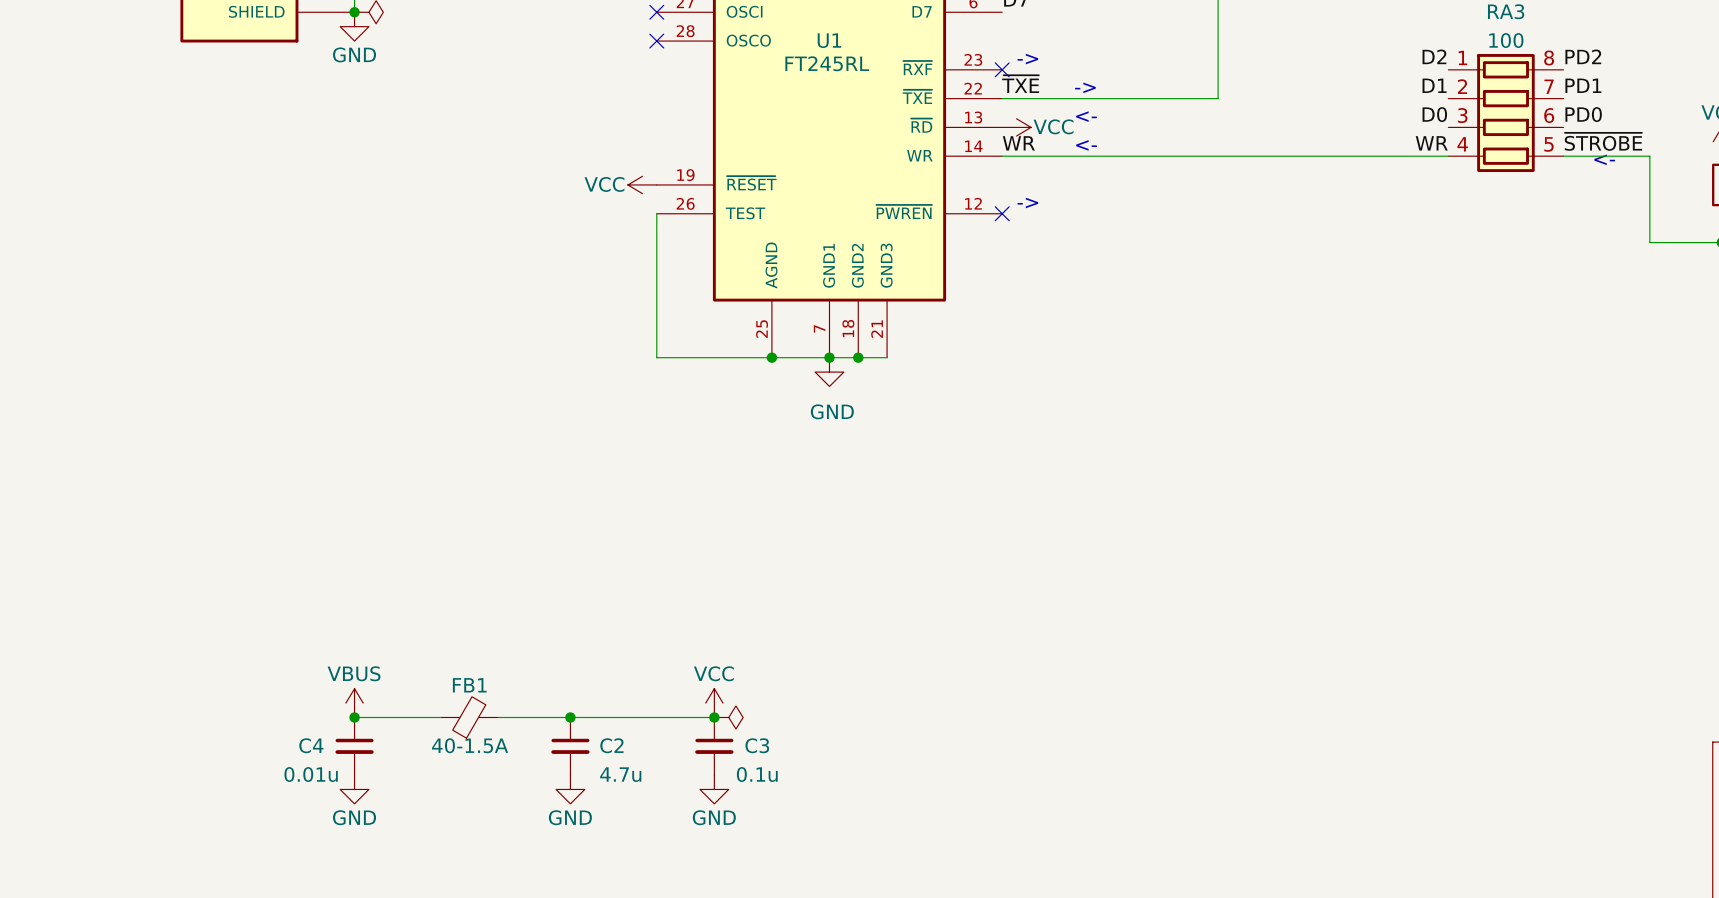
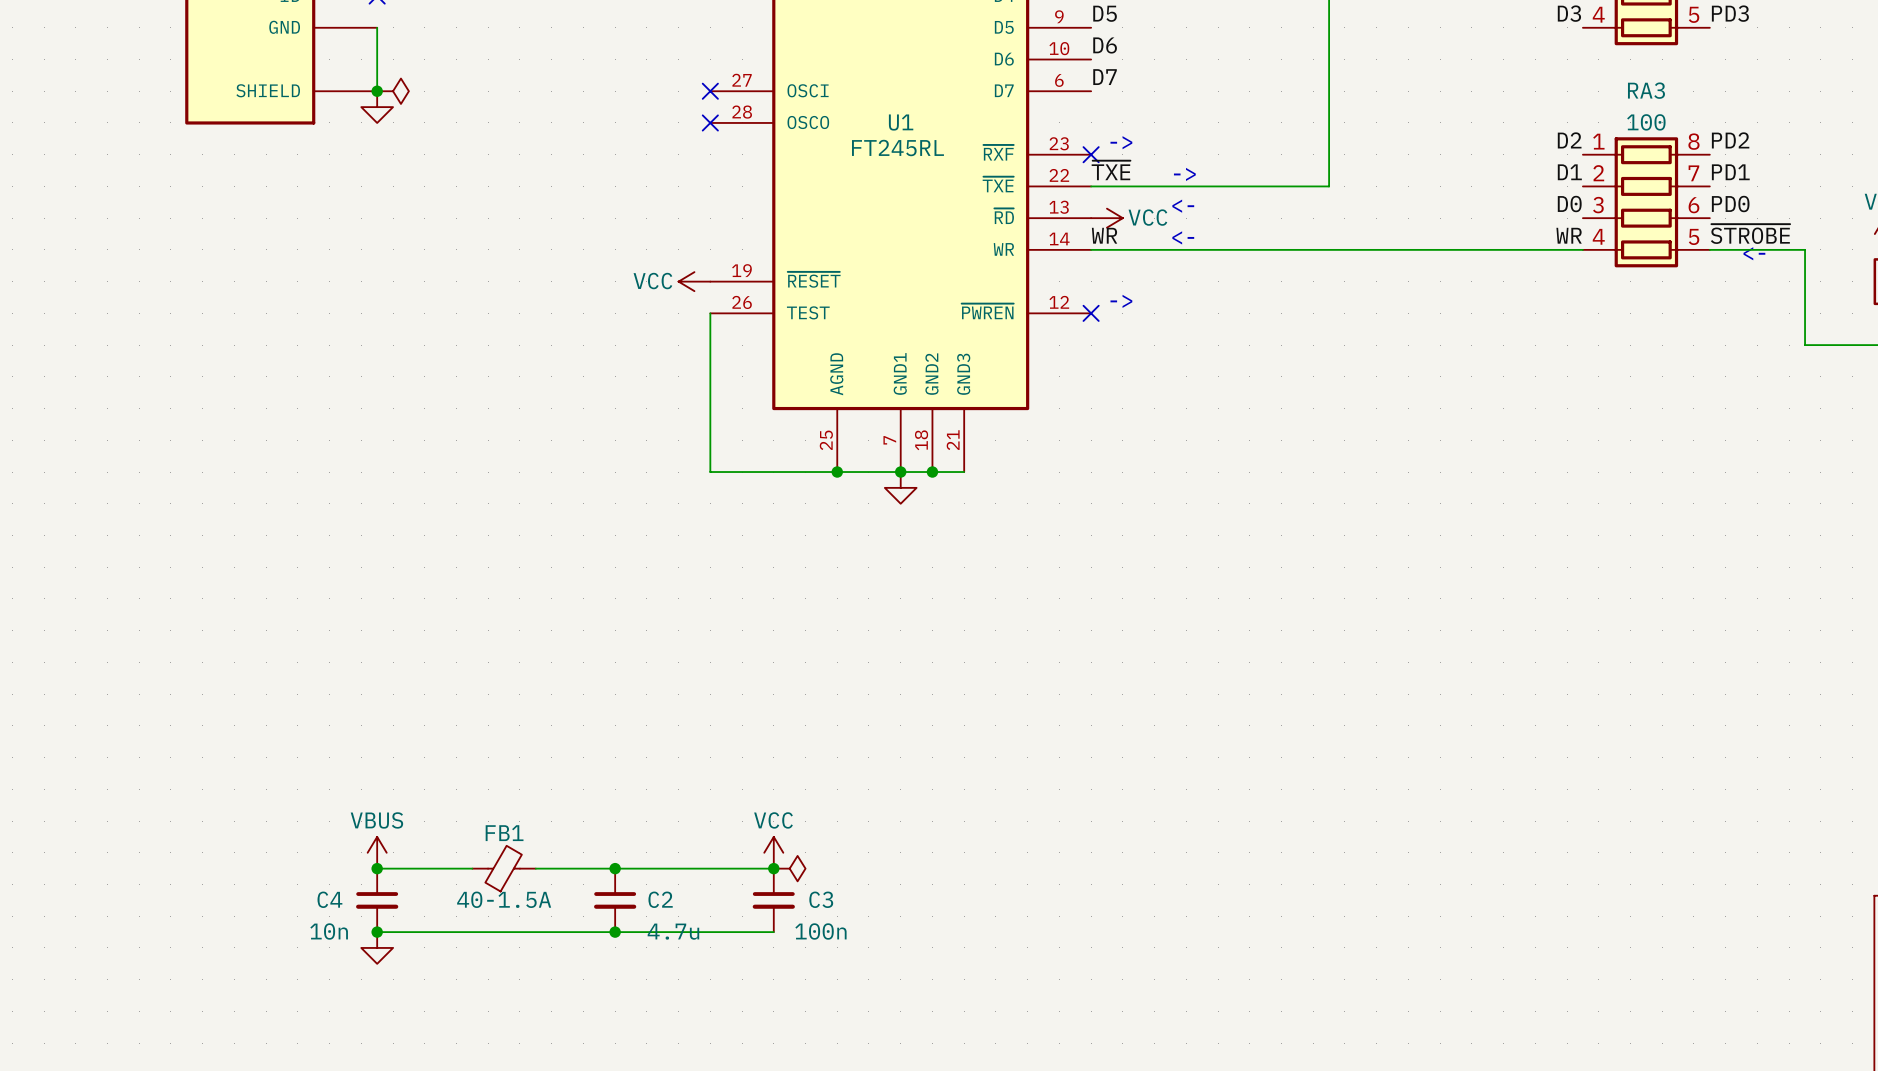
power symbol text: GND (354, 54) -> none
power symbol text: GND (832, 411) -> none
C4 value: 0.01u (311, 774) -> 10n (329, 931)
C3 value: 0.1u (757, 774) -> 100n (820, 931)
wire: none -> (377, 932) (773, 932)
junction: none -> (377, 932)
junction: none -> (615, 932)
power symbol: GND (570, 789) -> none
power symbol: GND (714, 789) -> none
power symbol text: GND (354, 817) -> none

